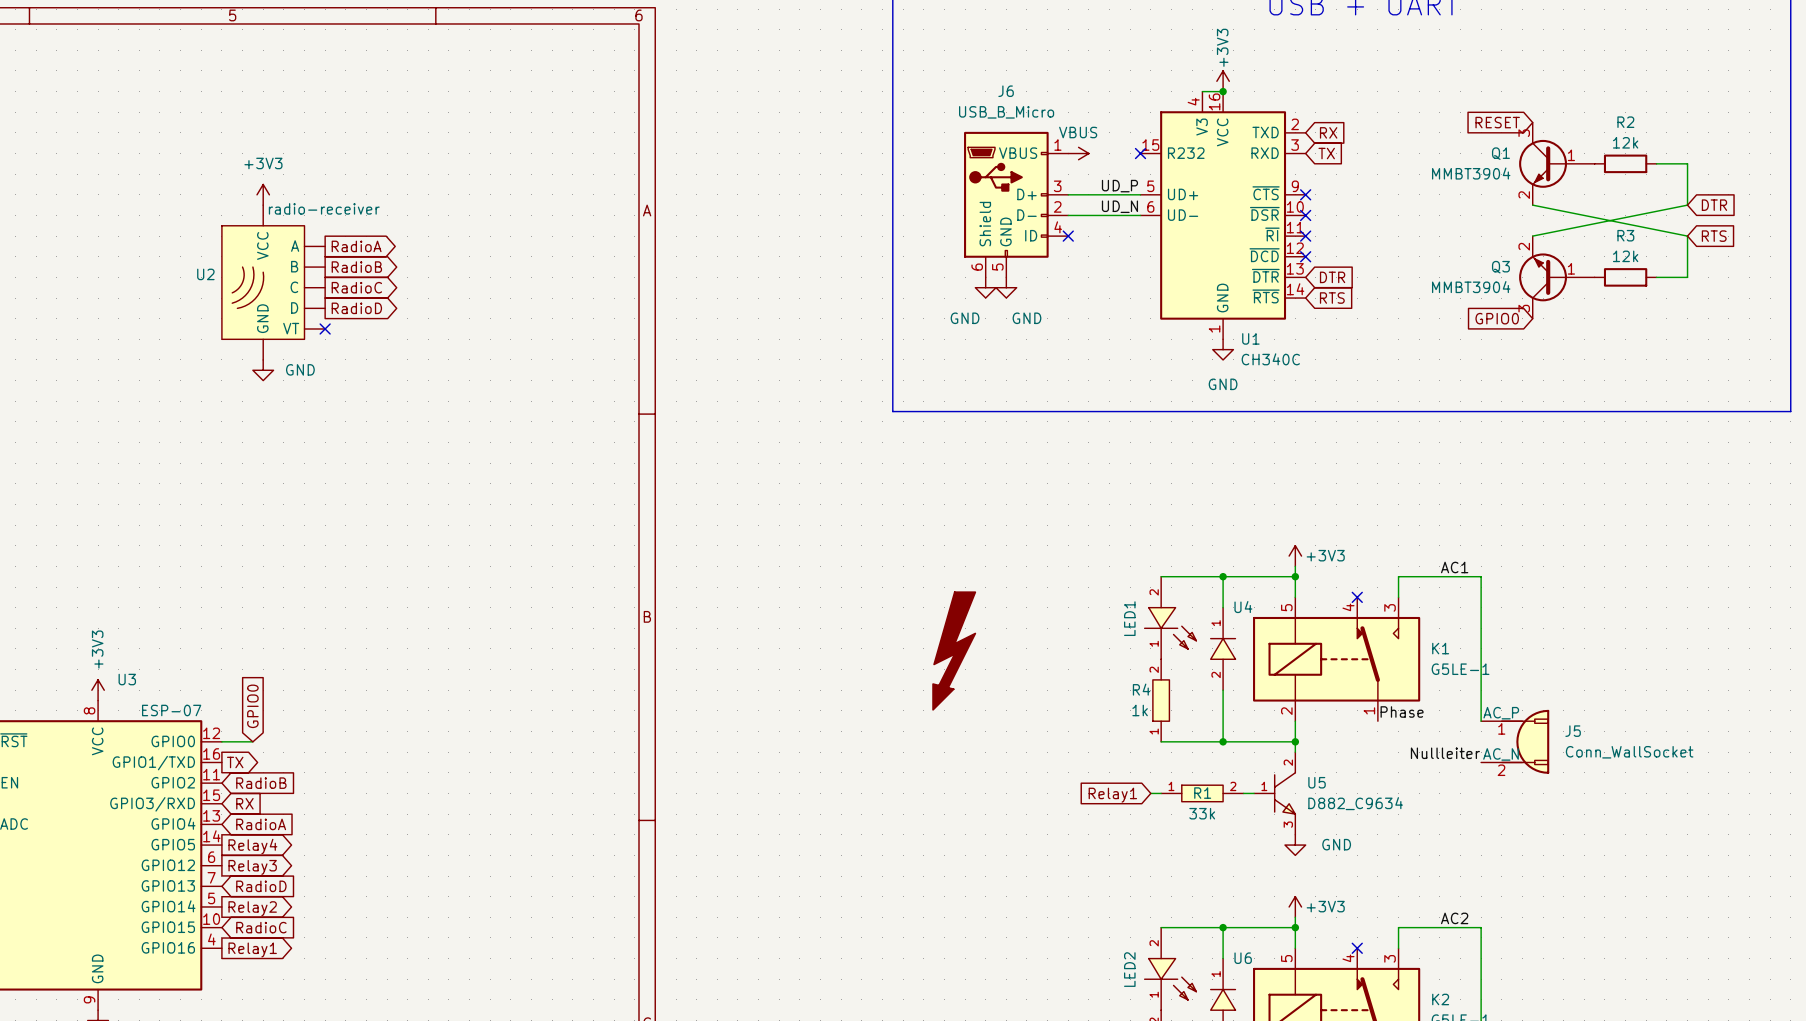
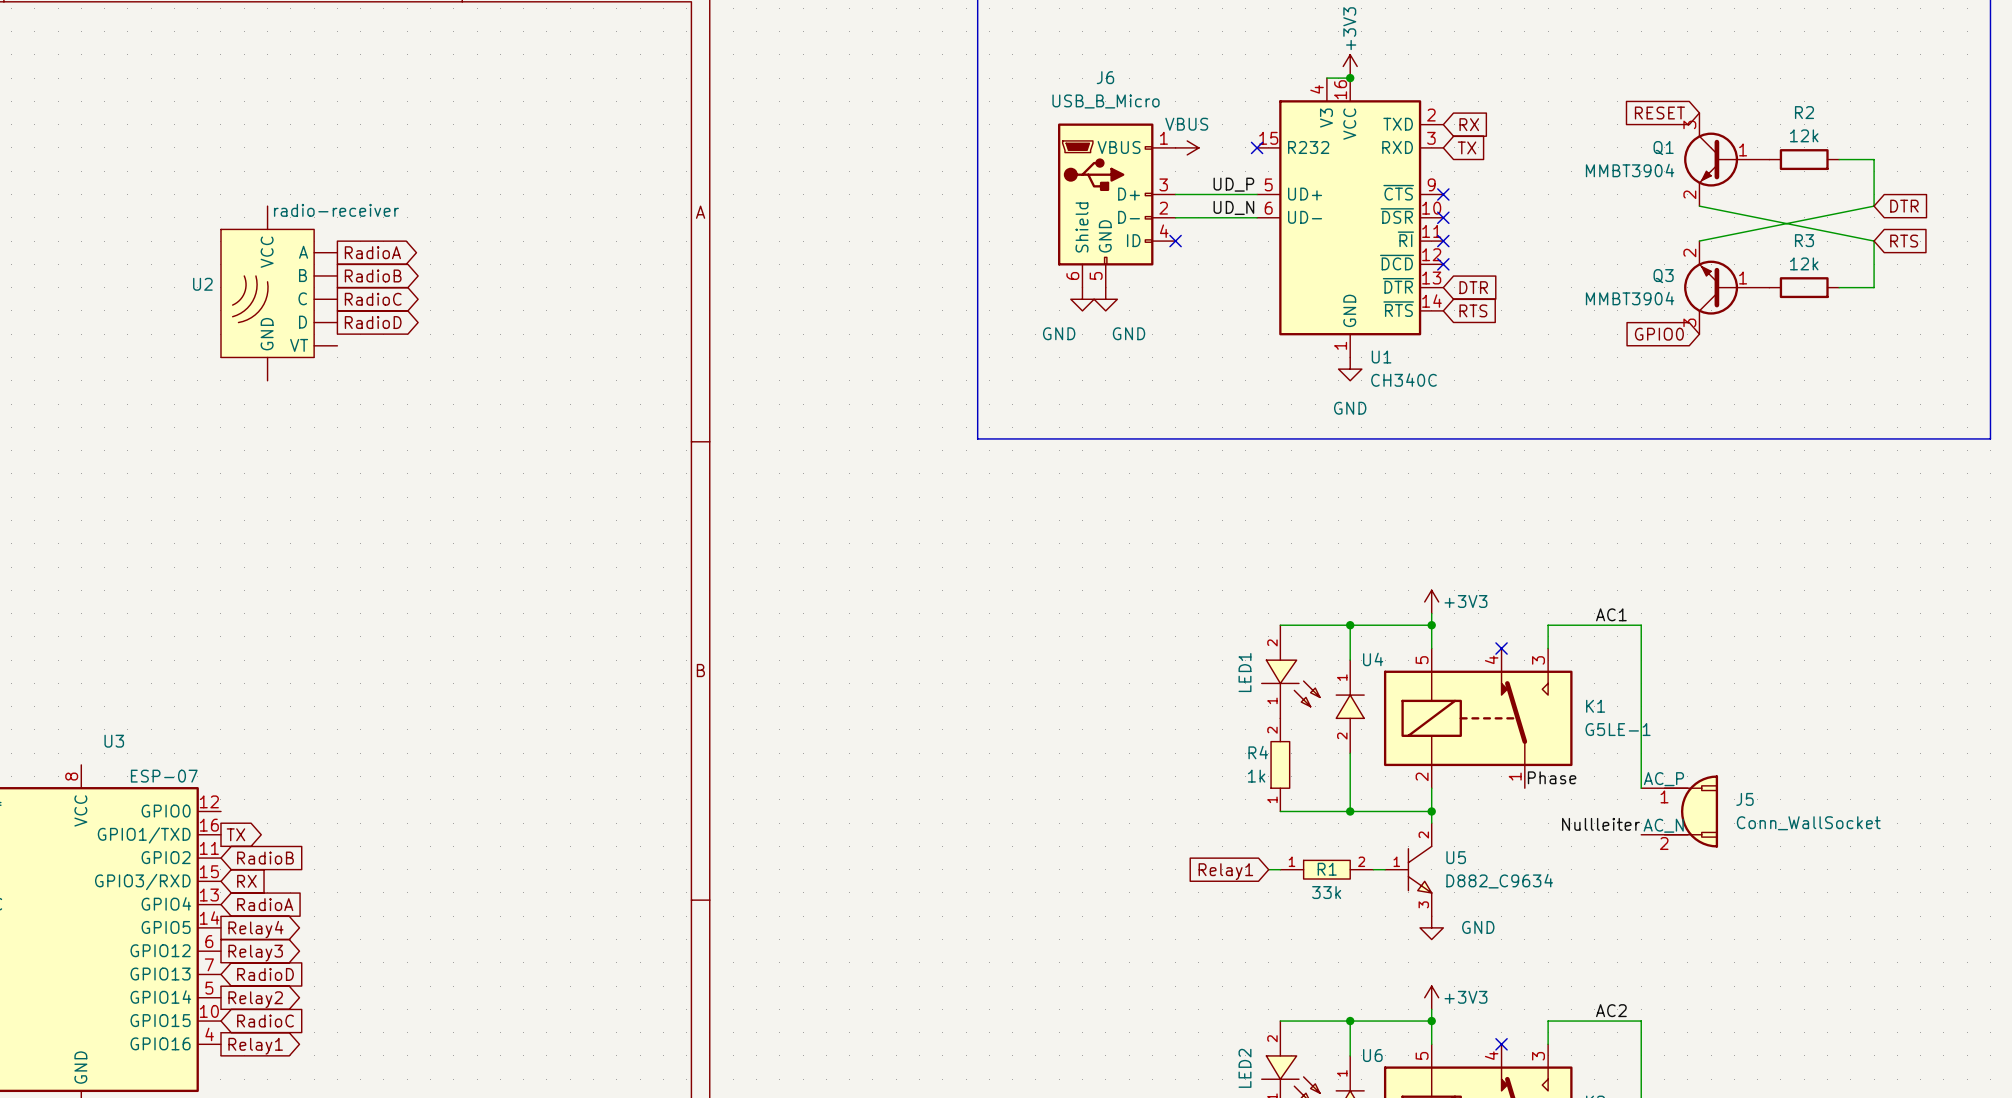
power symbol: +3V3 (263, 194) -> none
no-connect mark: (325, 328) -> none
power symbol: GND (263, 370) -> none
part: (954, 651) -> none
power symbol: +3V3 (98, 690) -> none
global label: GPIO0 (252, 706) -> none
wire: (221, 741) (252, 741) -> none

